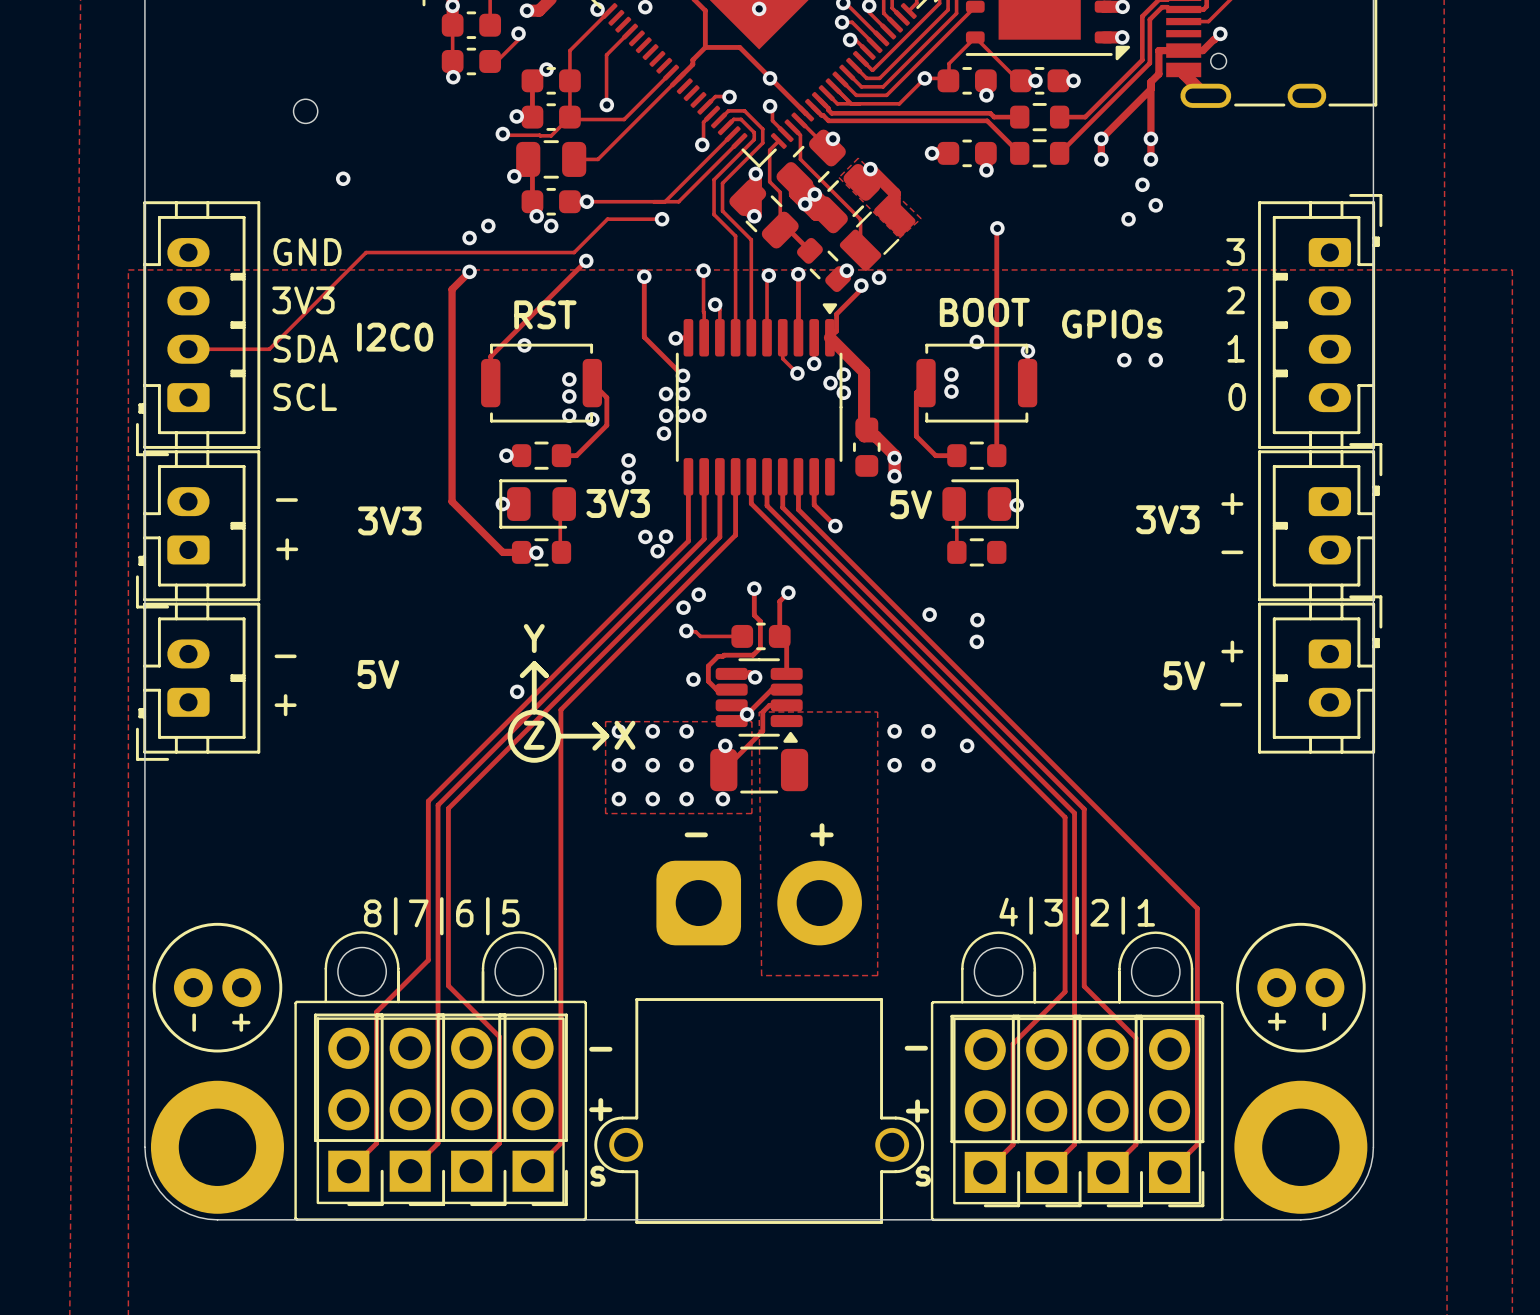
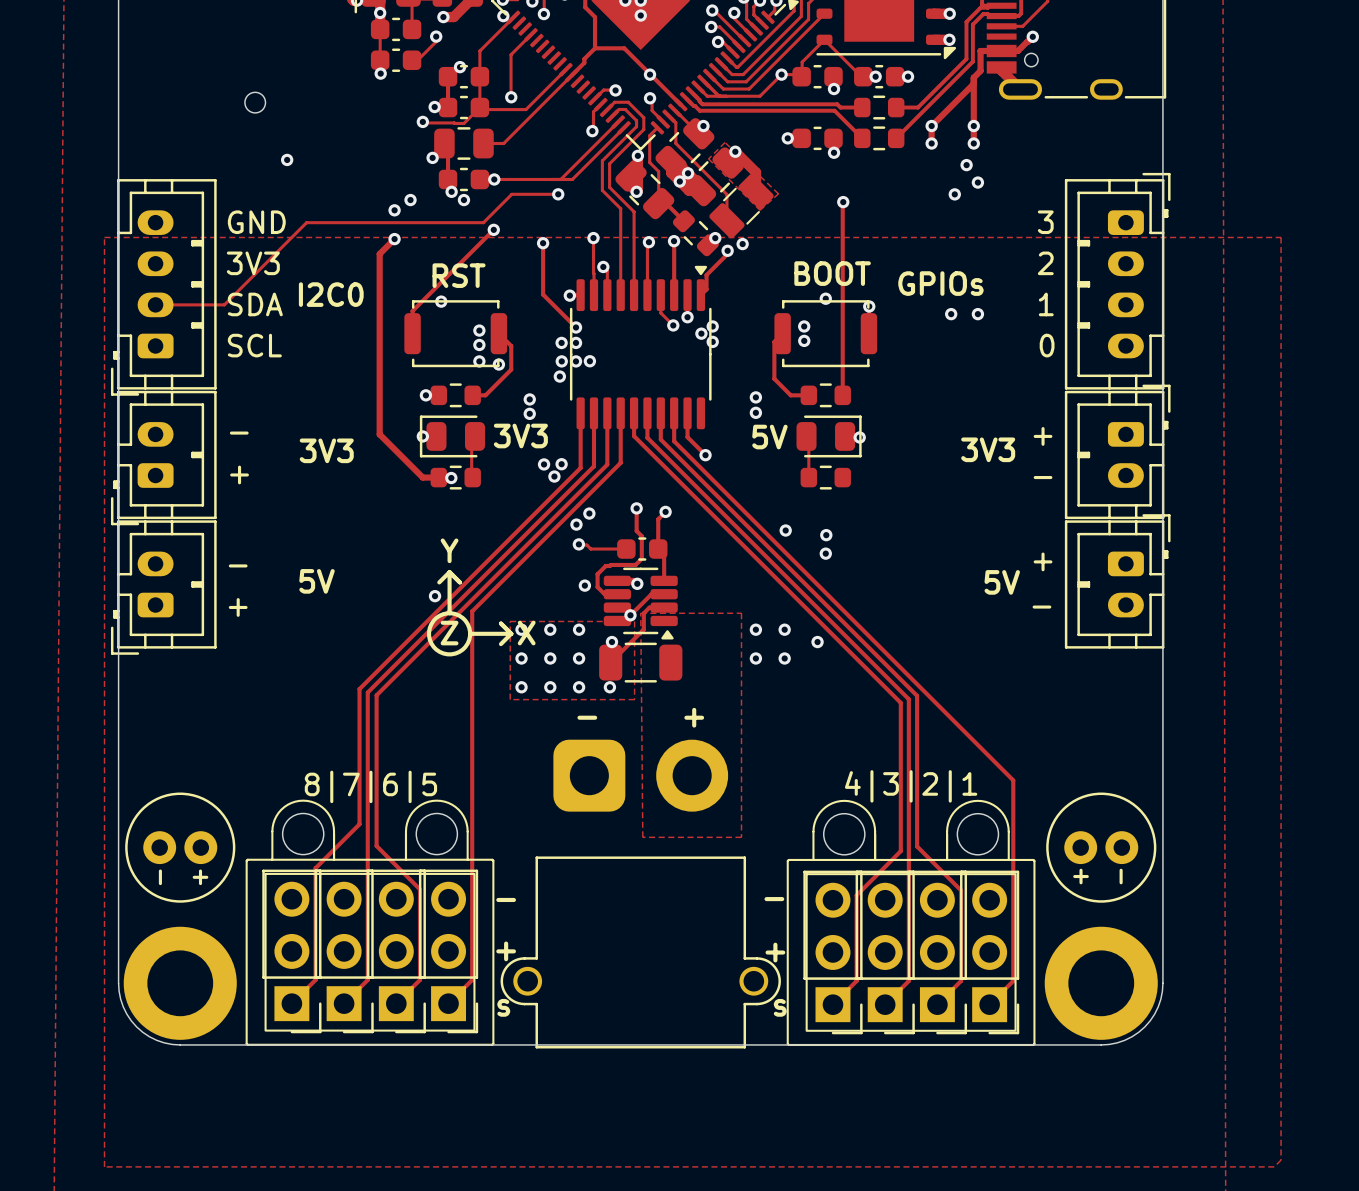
track: (829, 337) (864, 371) (864, 436) (875, 436) (894, 455) (894, 476) -> none
part: (866, 447) -> none

